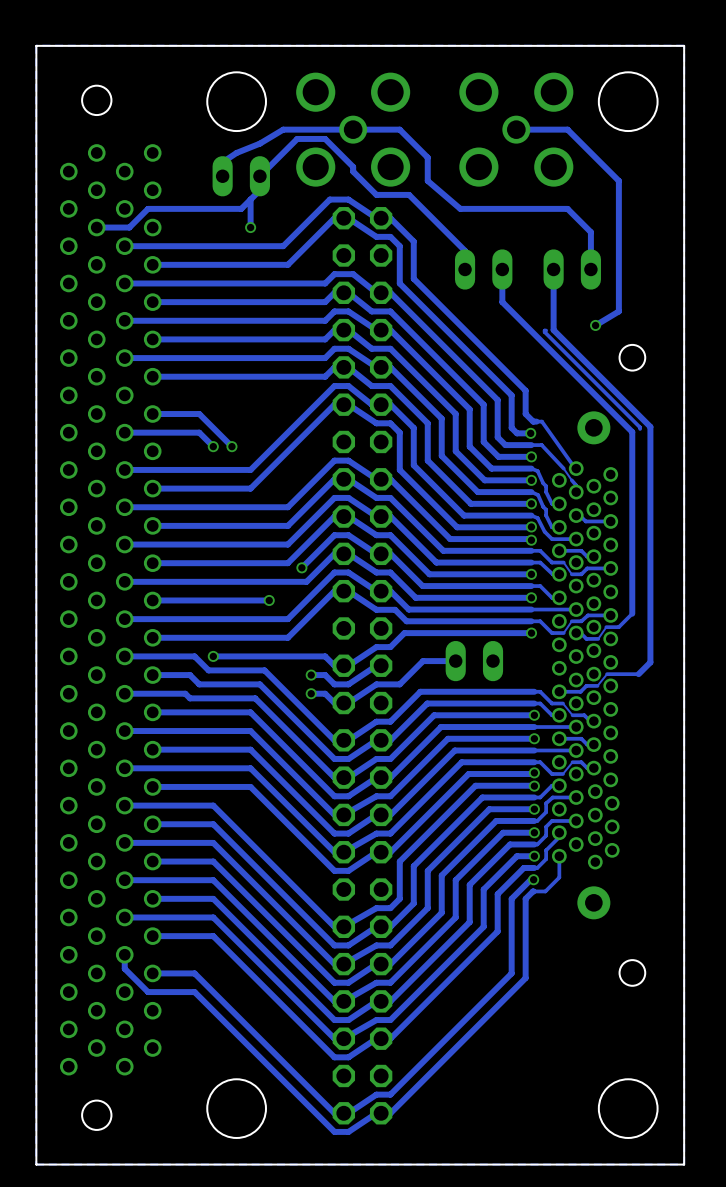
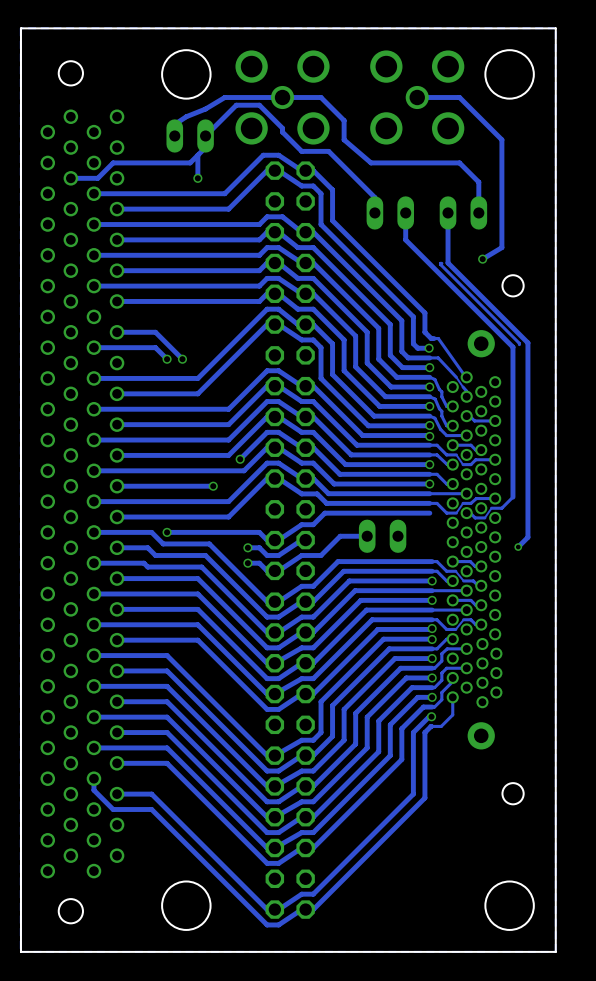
via: (531, 633) -> none
track: (638, 674) (607, 674) (597, 685) (586, 685) (580, 691) -> (481, 566) (475, 566) (470, 561)
via: none -> (518, 547)

